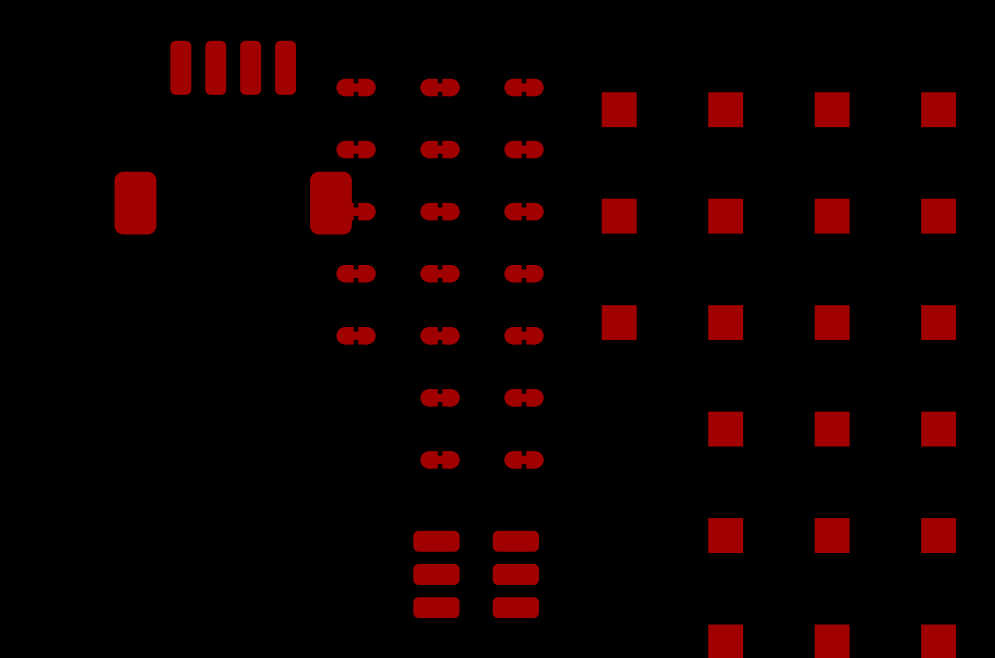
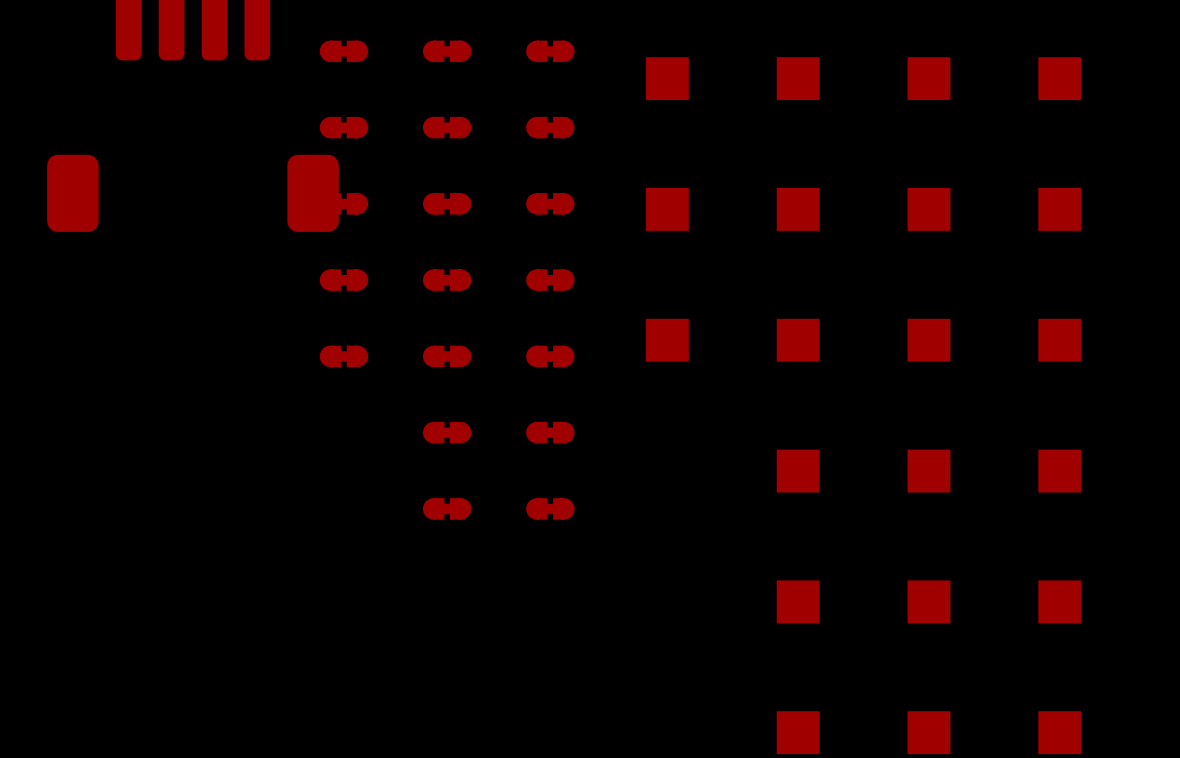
part: (476, 574) -> none

